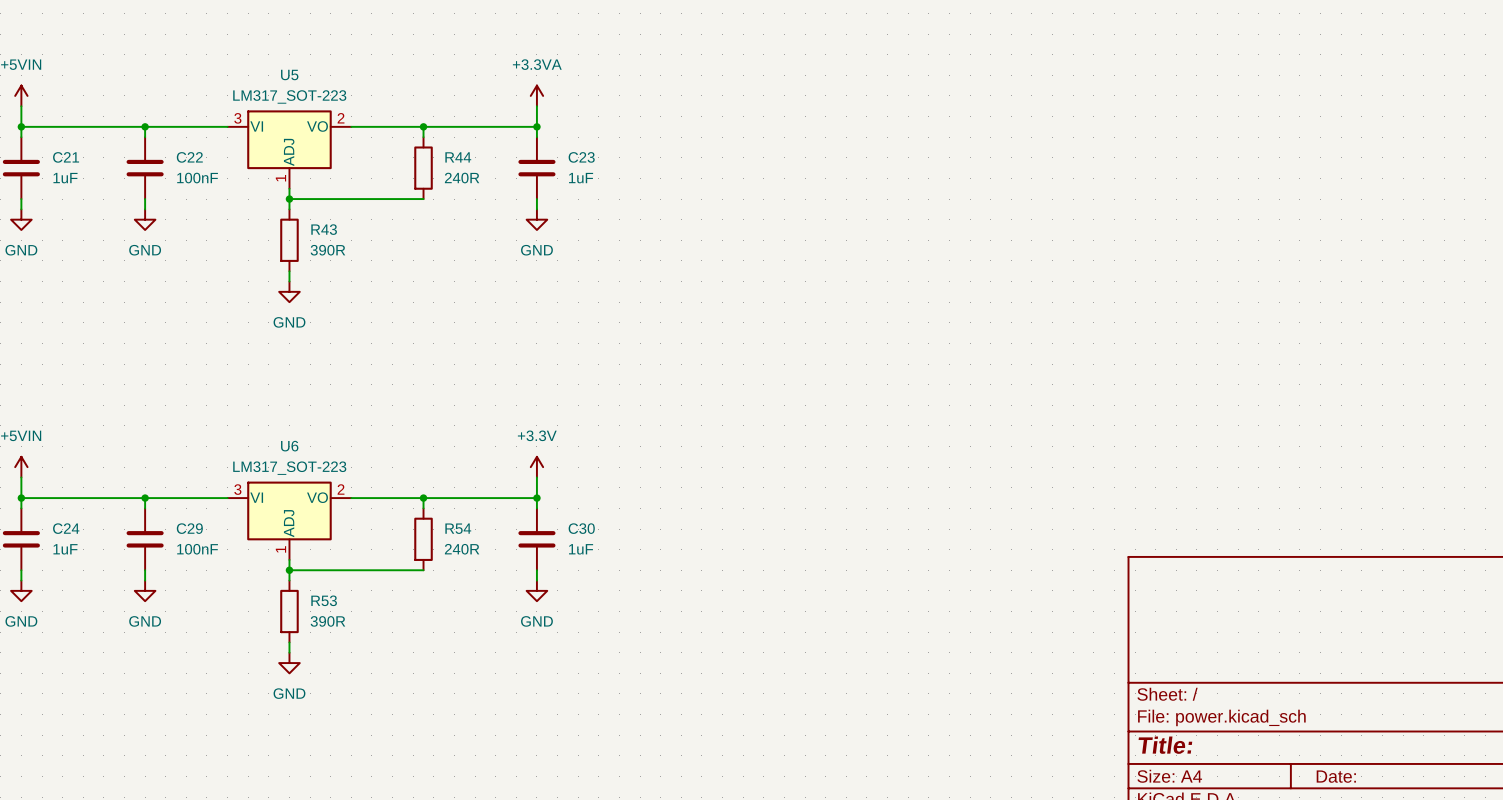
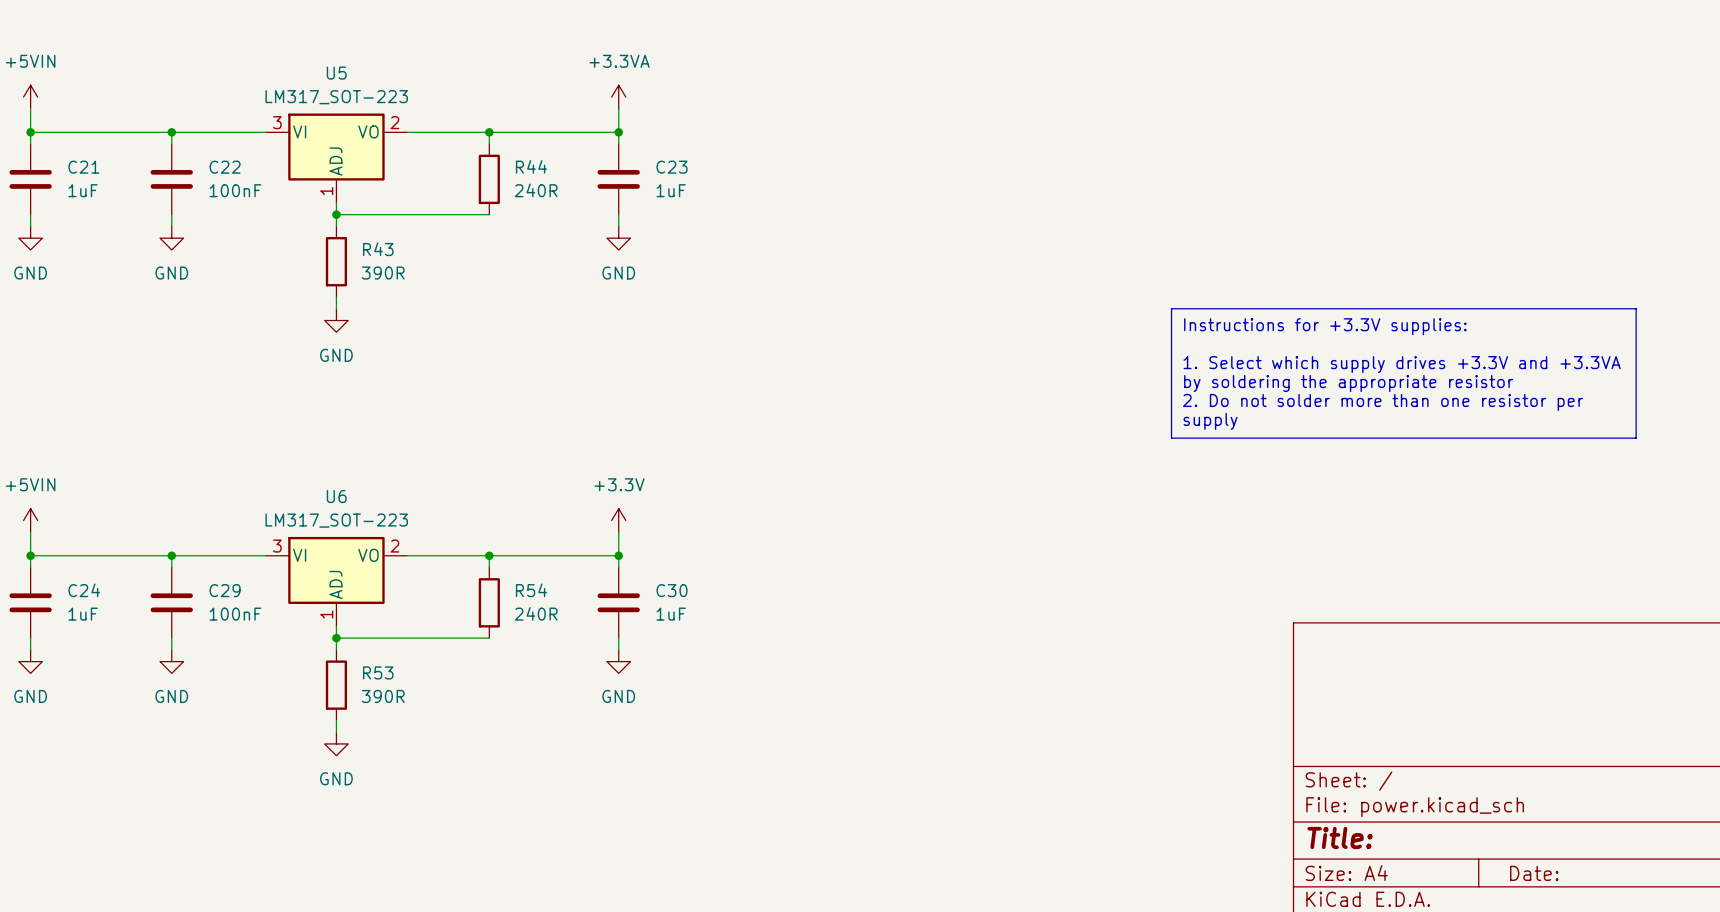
line: none -> (1171, 308) (1636, 308) (1636, 438) (1171, 438) (1171, 308)
text: none -> Instructions for +3.3V supplies: (1325, 326)
text: none -> 1. Select which supply drives +3.3V and +3.3VA (1402, 364)
text: none -> by soldering the appropriate resistor (1348, 383)
text: none -> 2. Do not solder more than one resistor per (1383, 402)
text: none -> supply (1210, 421)

